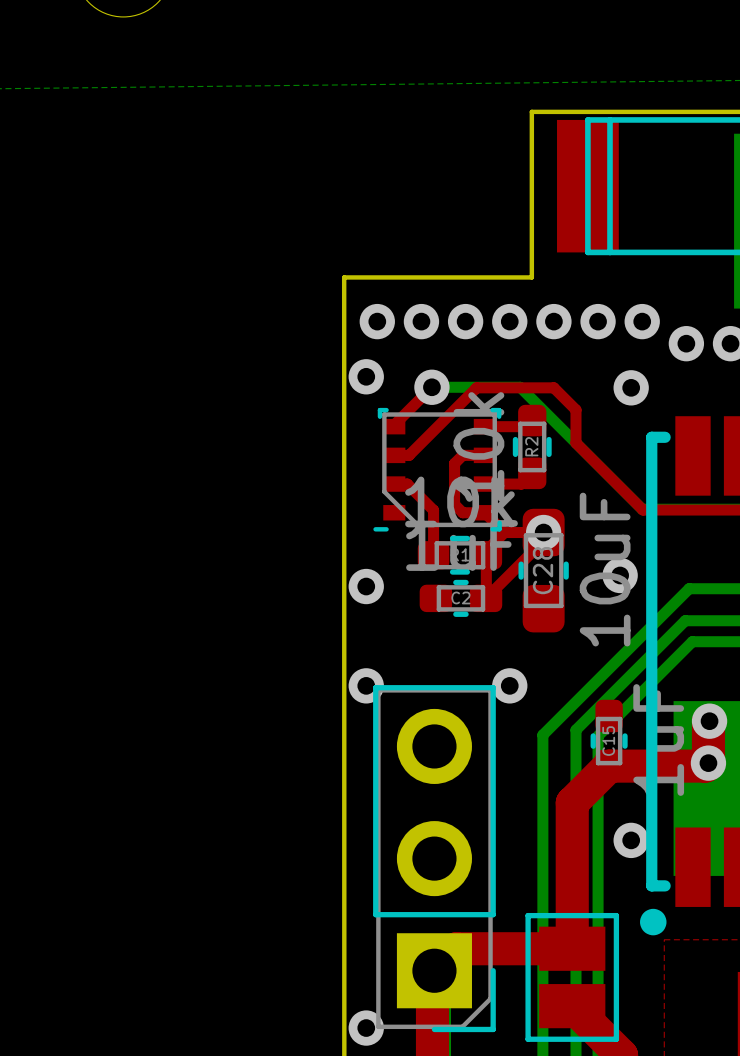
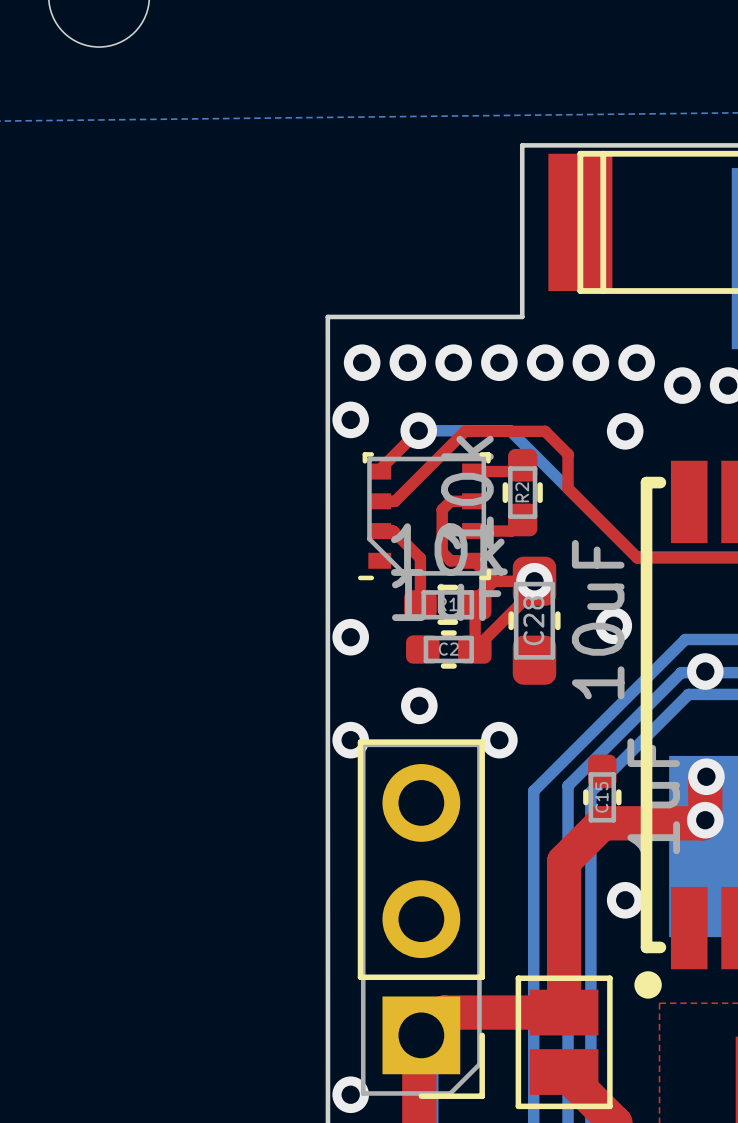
via: none -> (705, 671)
via: none -> (419, 705)

